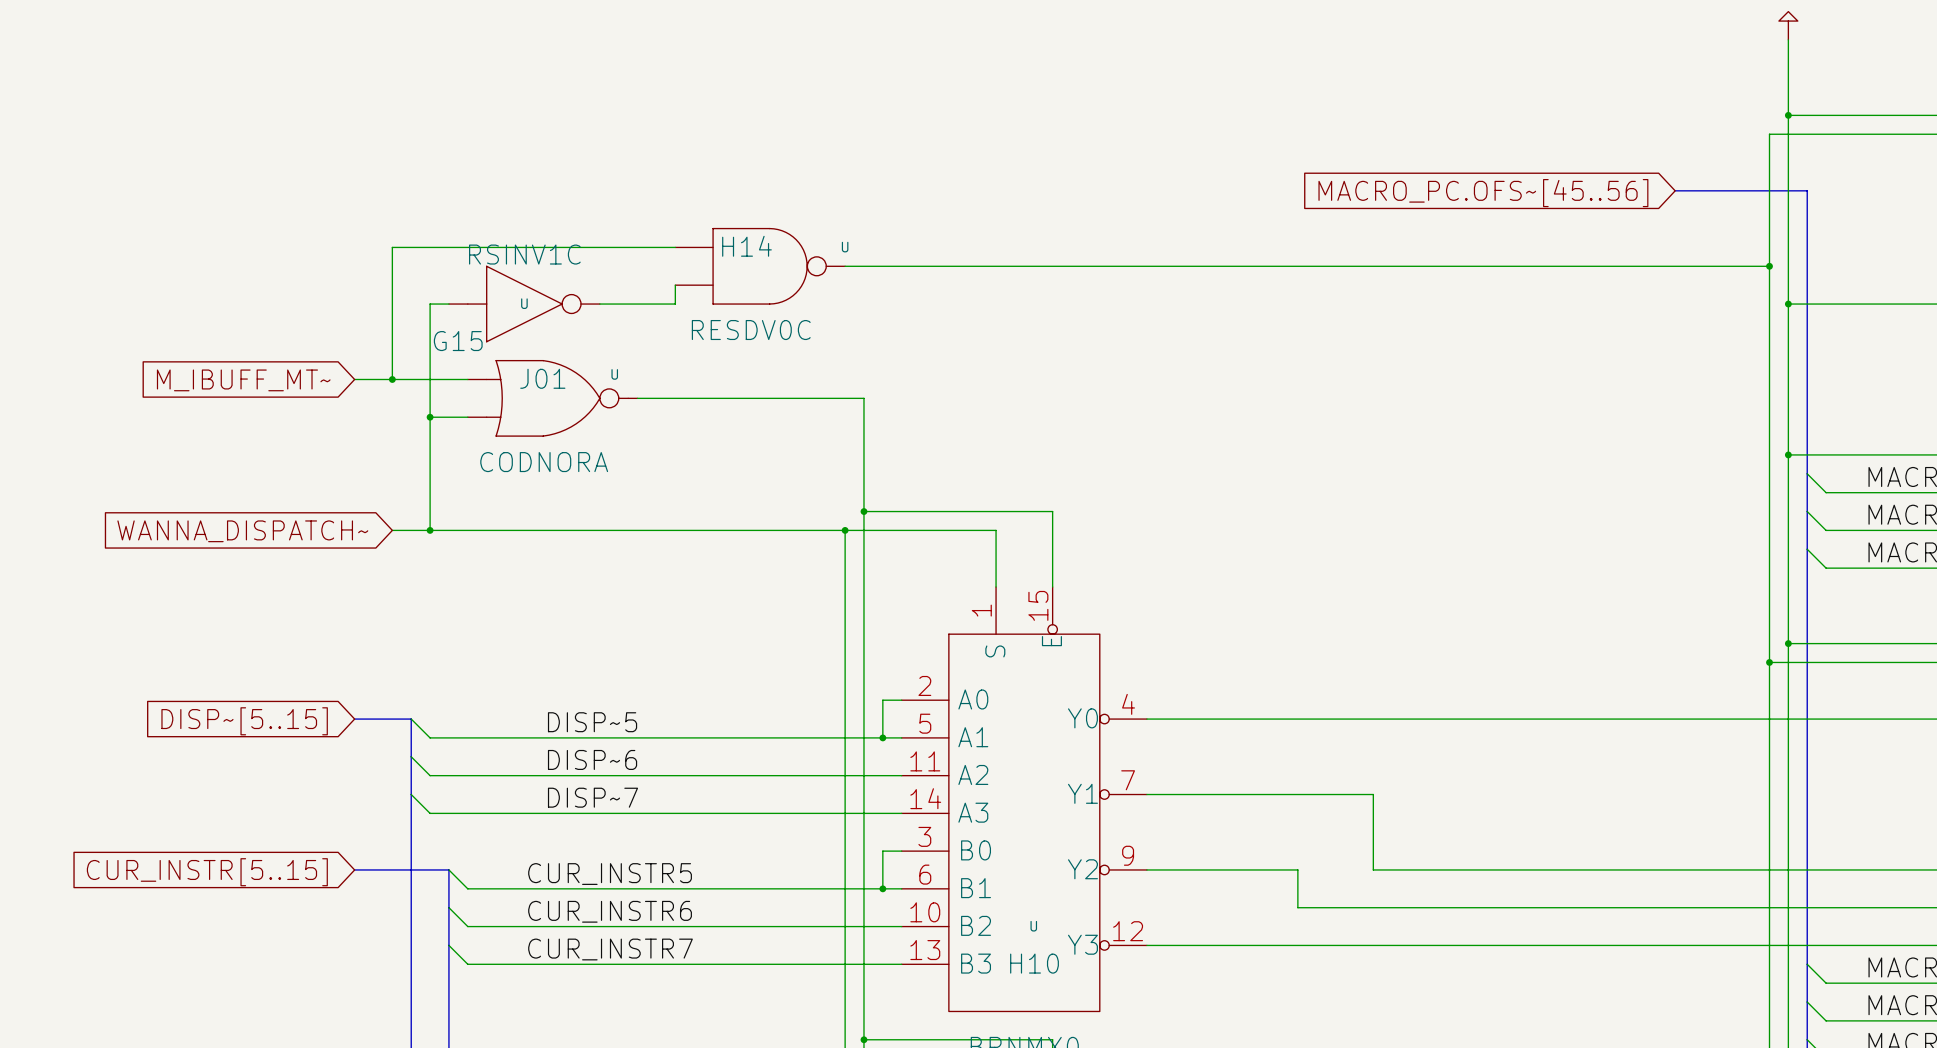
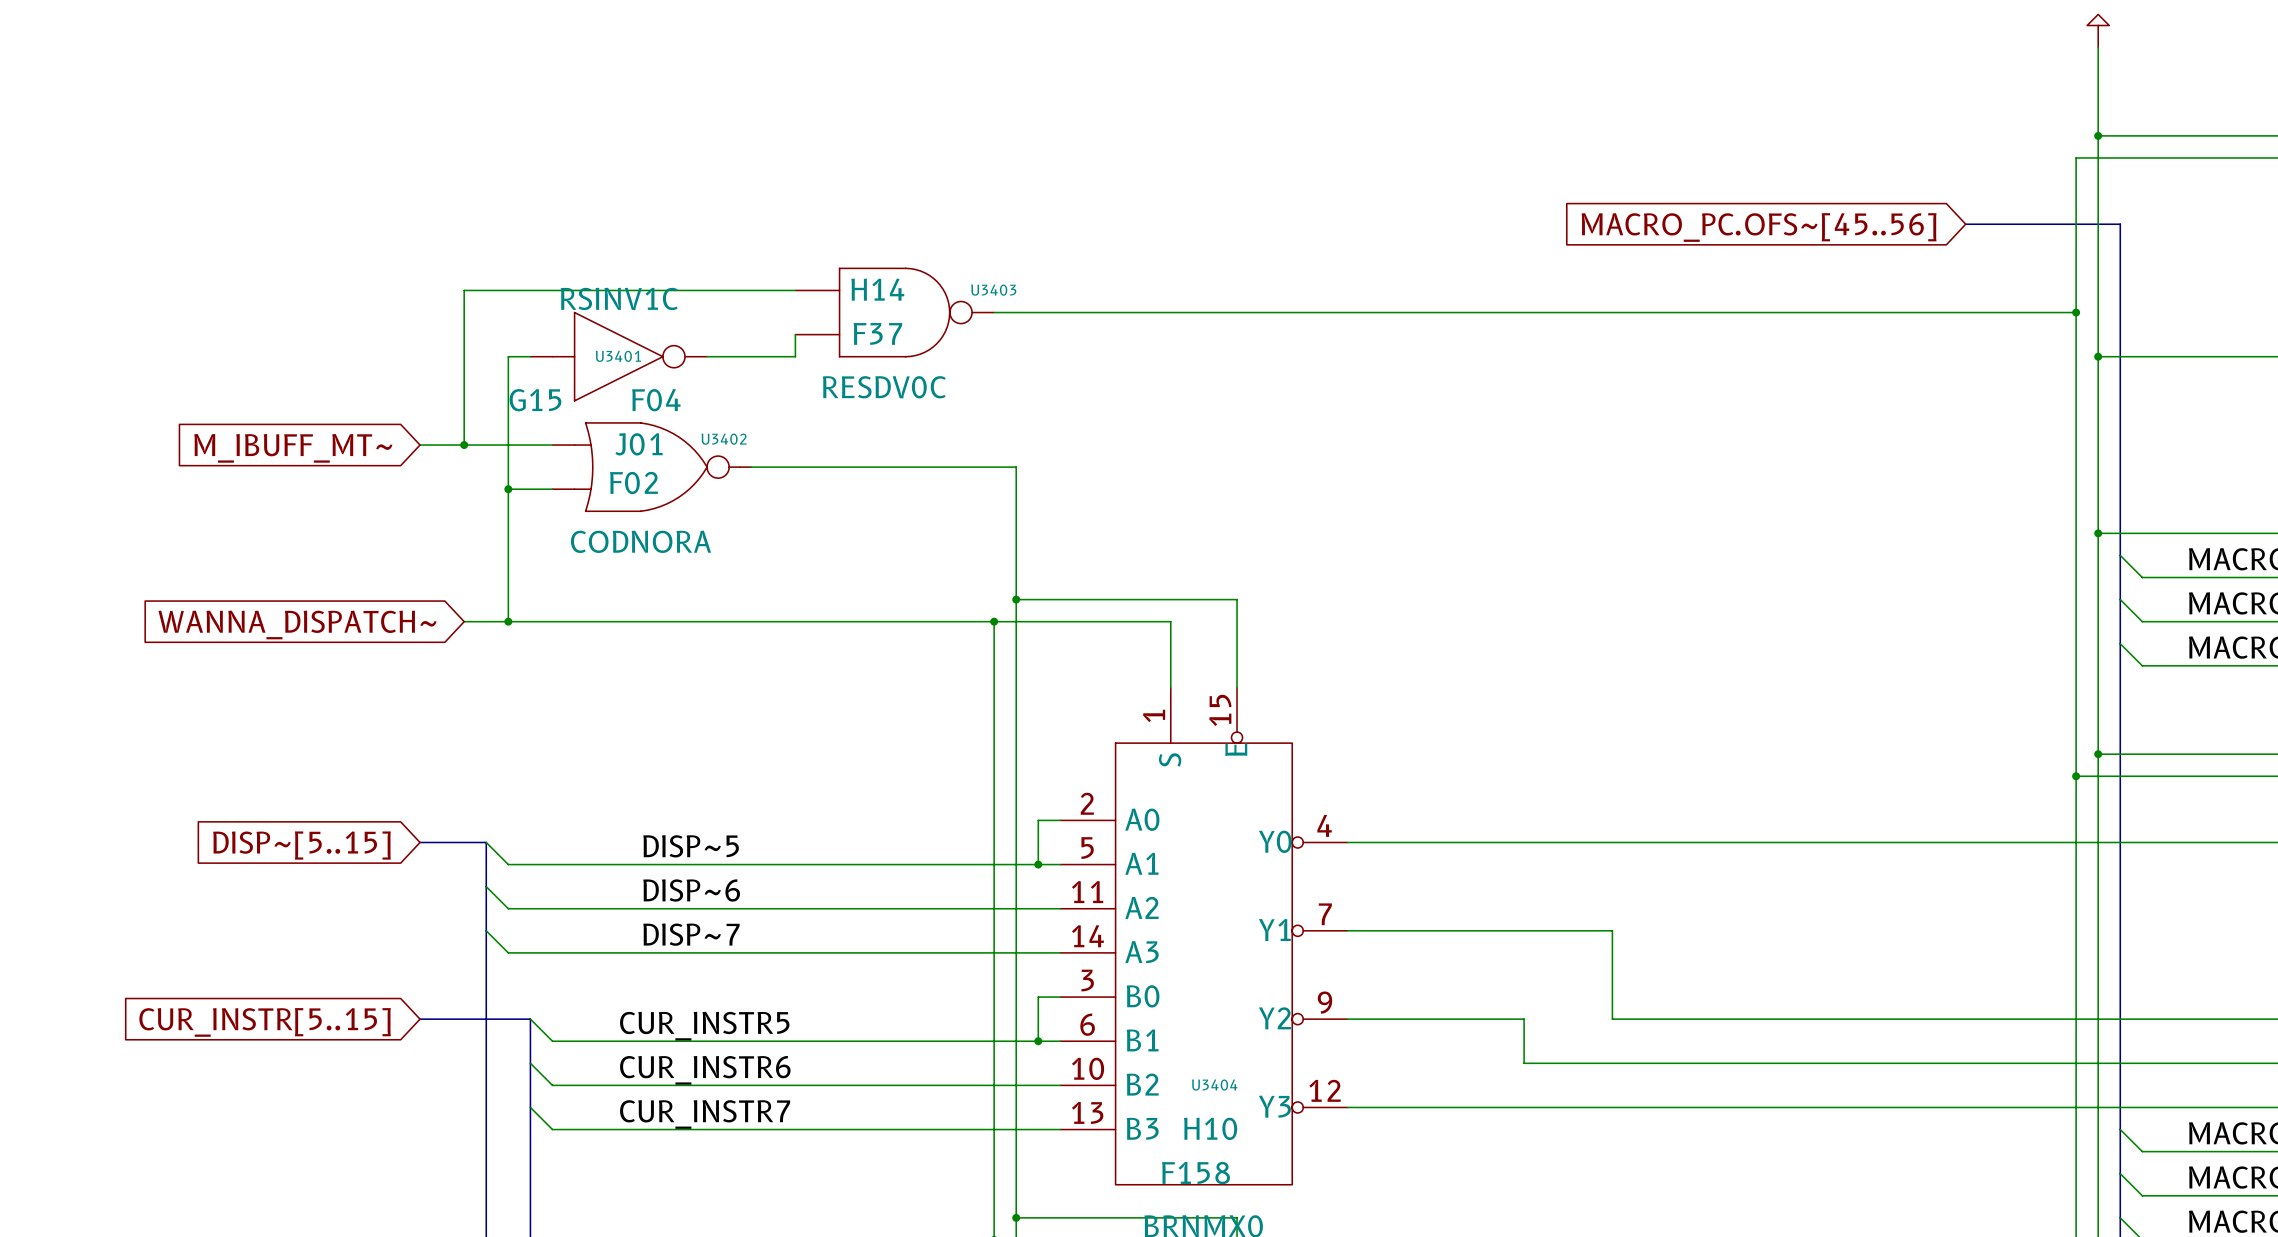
U name: U (845, 247) -> U3403 (993, 290)
U value: none -> F37 (877, 333)
U name: U (524, 303) -> U3401 (618, 356)
U value: none -> F04 (656, 400)
U name: U (614, 374) -> U3402 (724, 439)
U value: none -> F02 (633, 482)
U name: U (1033, 926) -> U3404 (1214, 1085)
U value: none -> F158 (1196, 1173)

